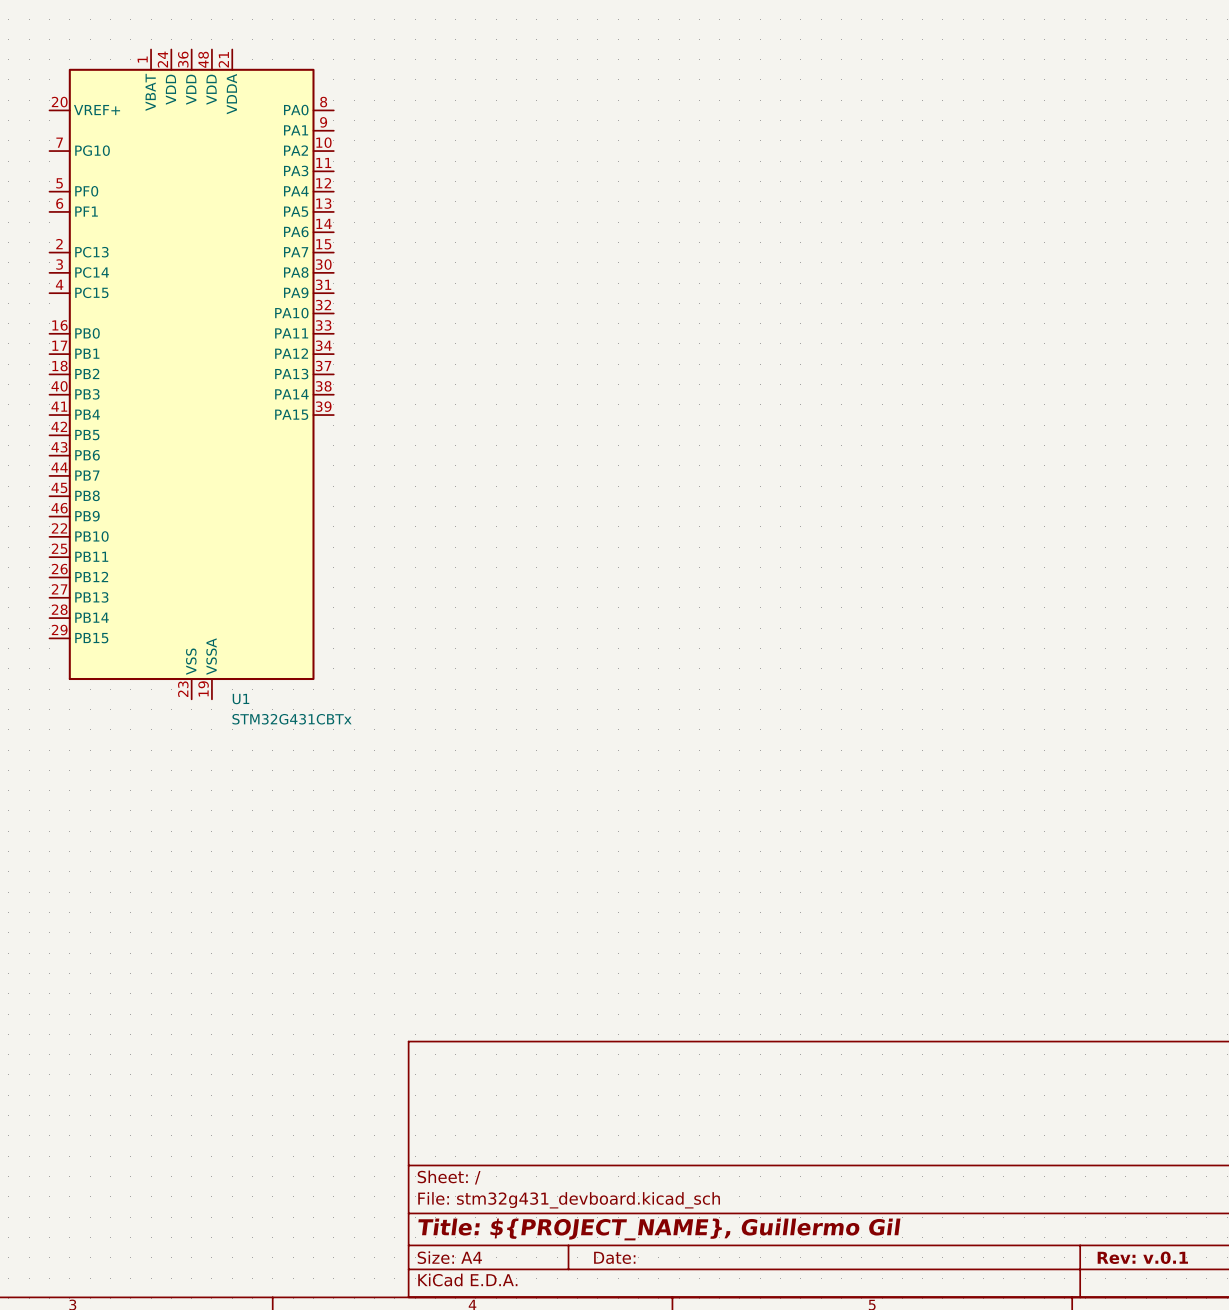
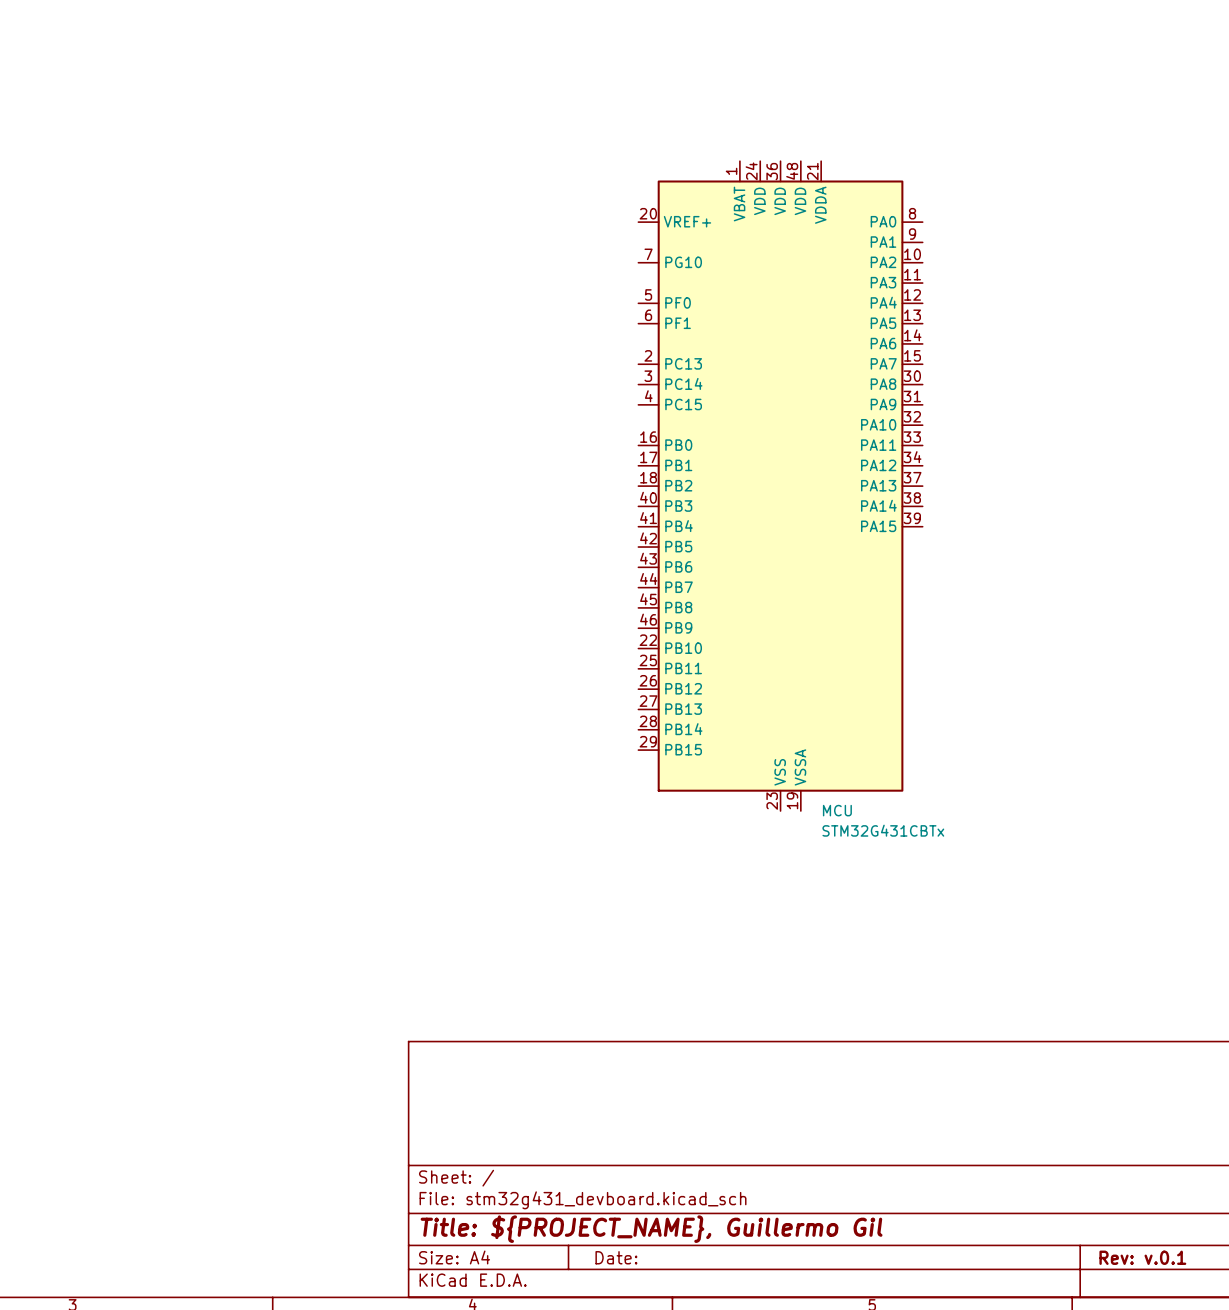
U1: STM32G431CBTx (191, 374) -> none
MCU: none -> STM32G431CBTx (780, 486)

